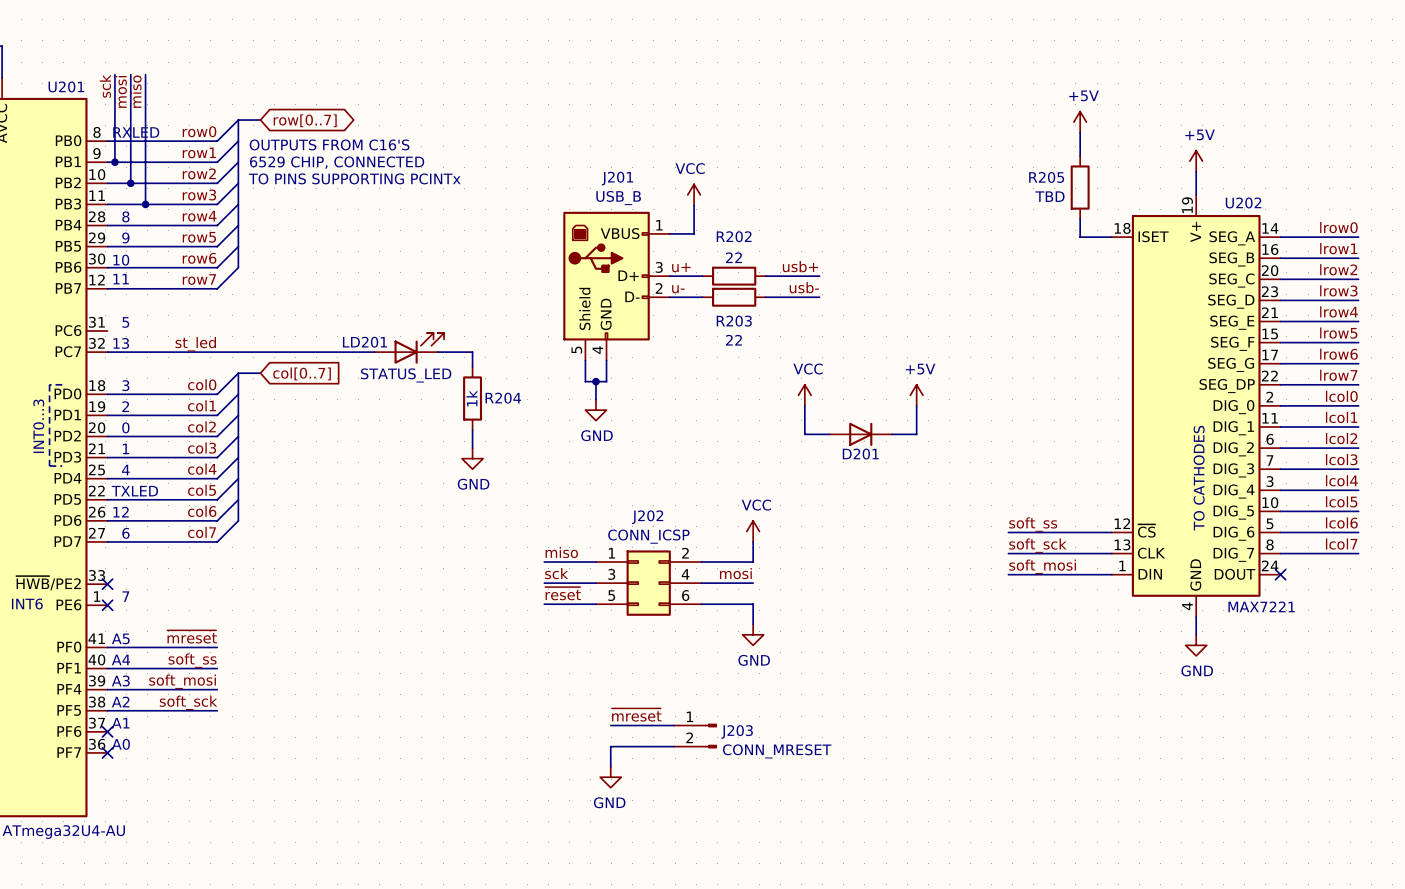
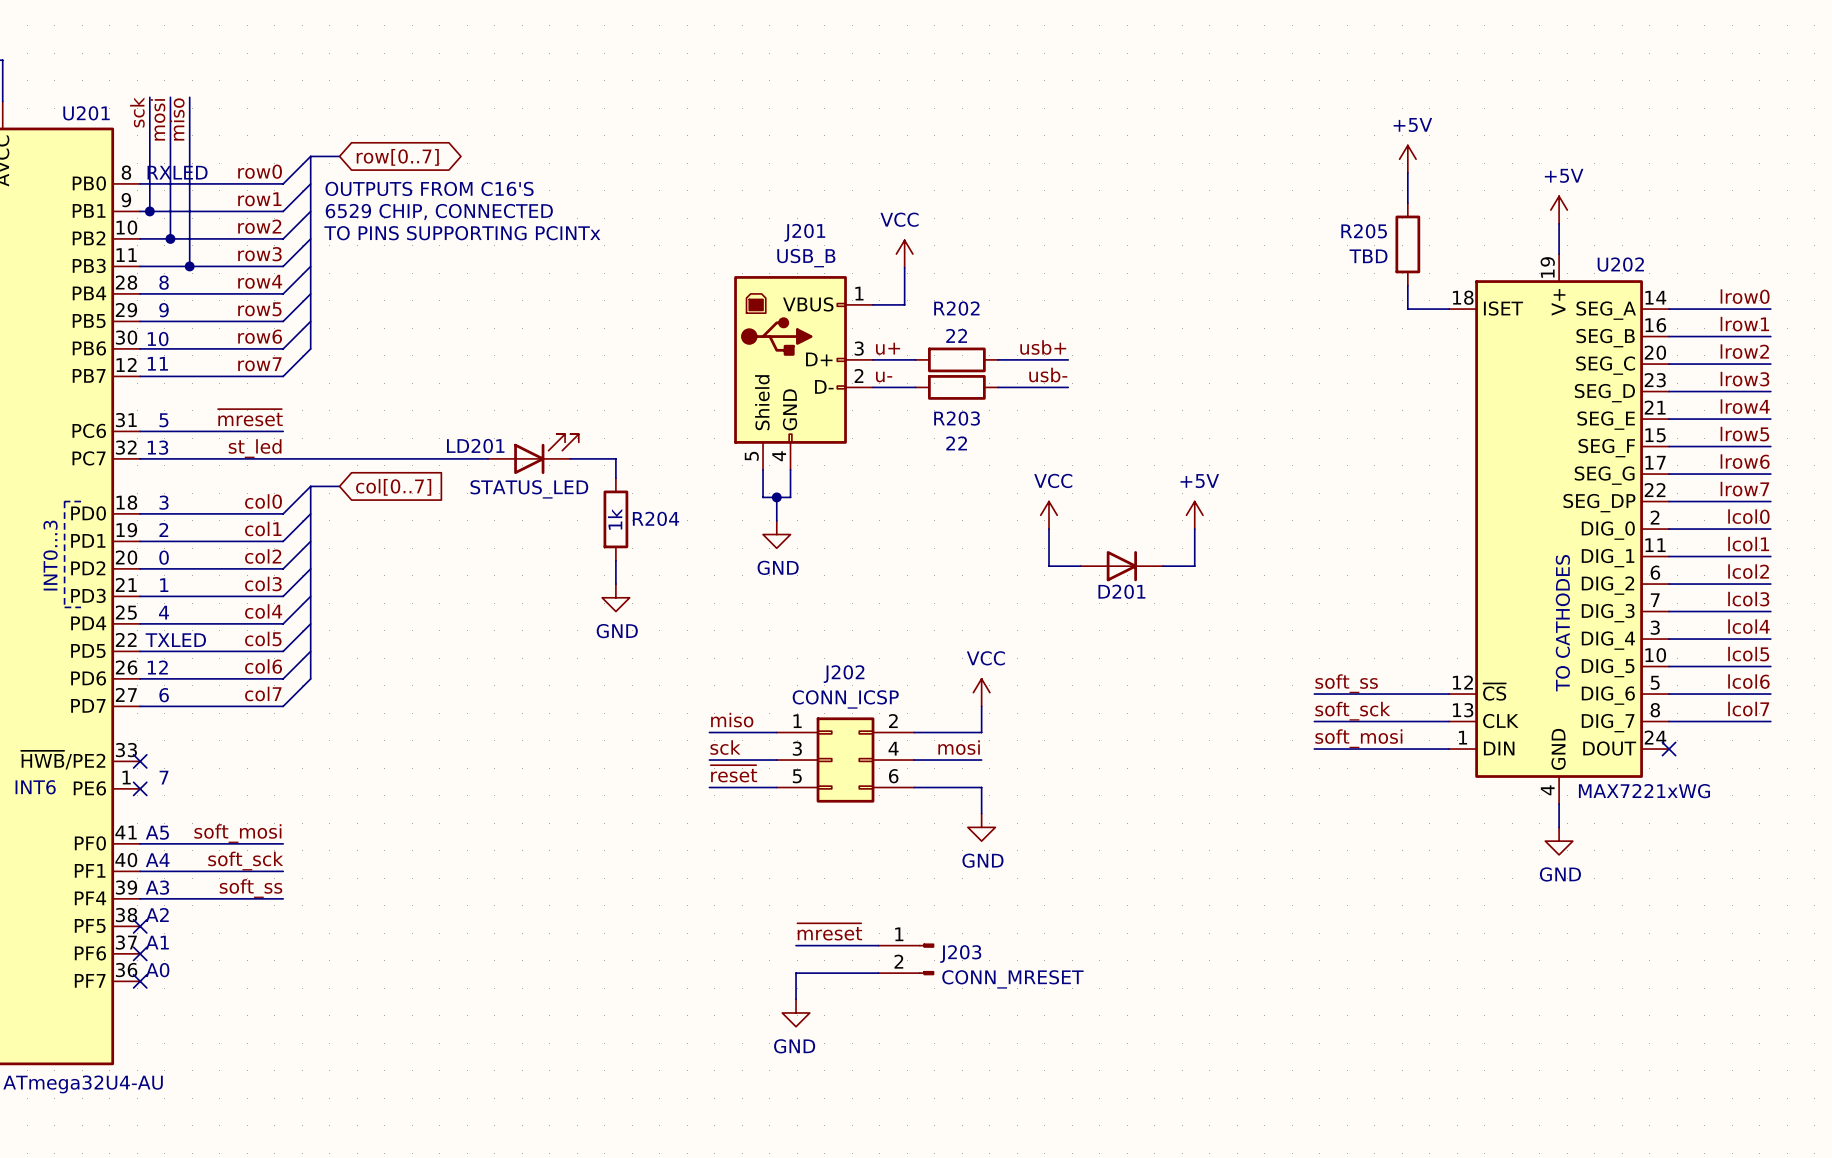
label: none -> ~{mreset} (250, 417)
wire: none -> (140, 431) (283, 431)
U202 value: MAX7221 (1261, 606) -> MAX7221xWG (1644, 791)
label: ~{mreset} (192, 636) -> soft_mosi (237, 833)
label: soft_ss (192, 660) -> soft_sck (245, 861)
label: soft_mosi (182, 681) -> soft_ss (251, 888)
label: soft_sck (188, 702) -> none
wire: (107, 710) (217, 710) -> none
no-connect mark: none -> (140, 926)

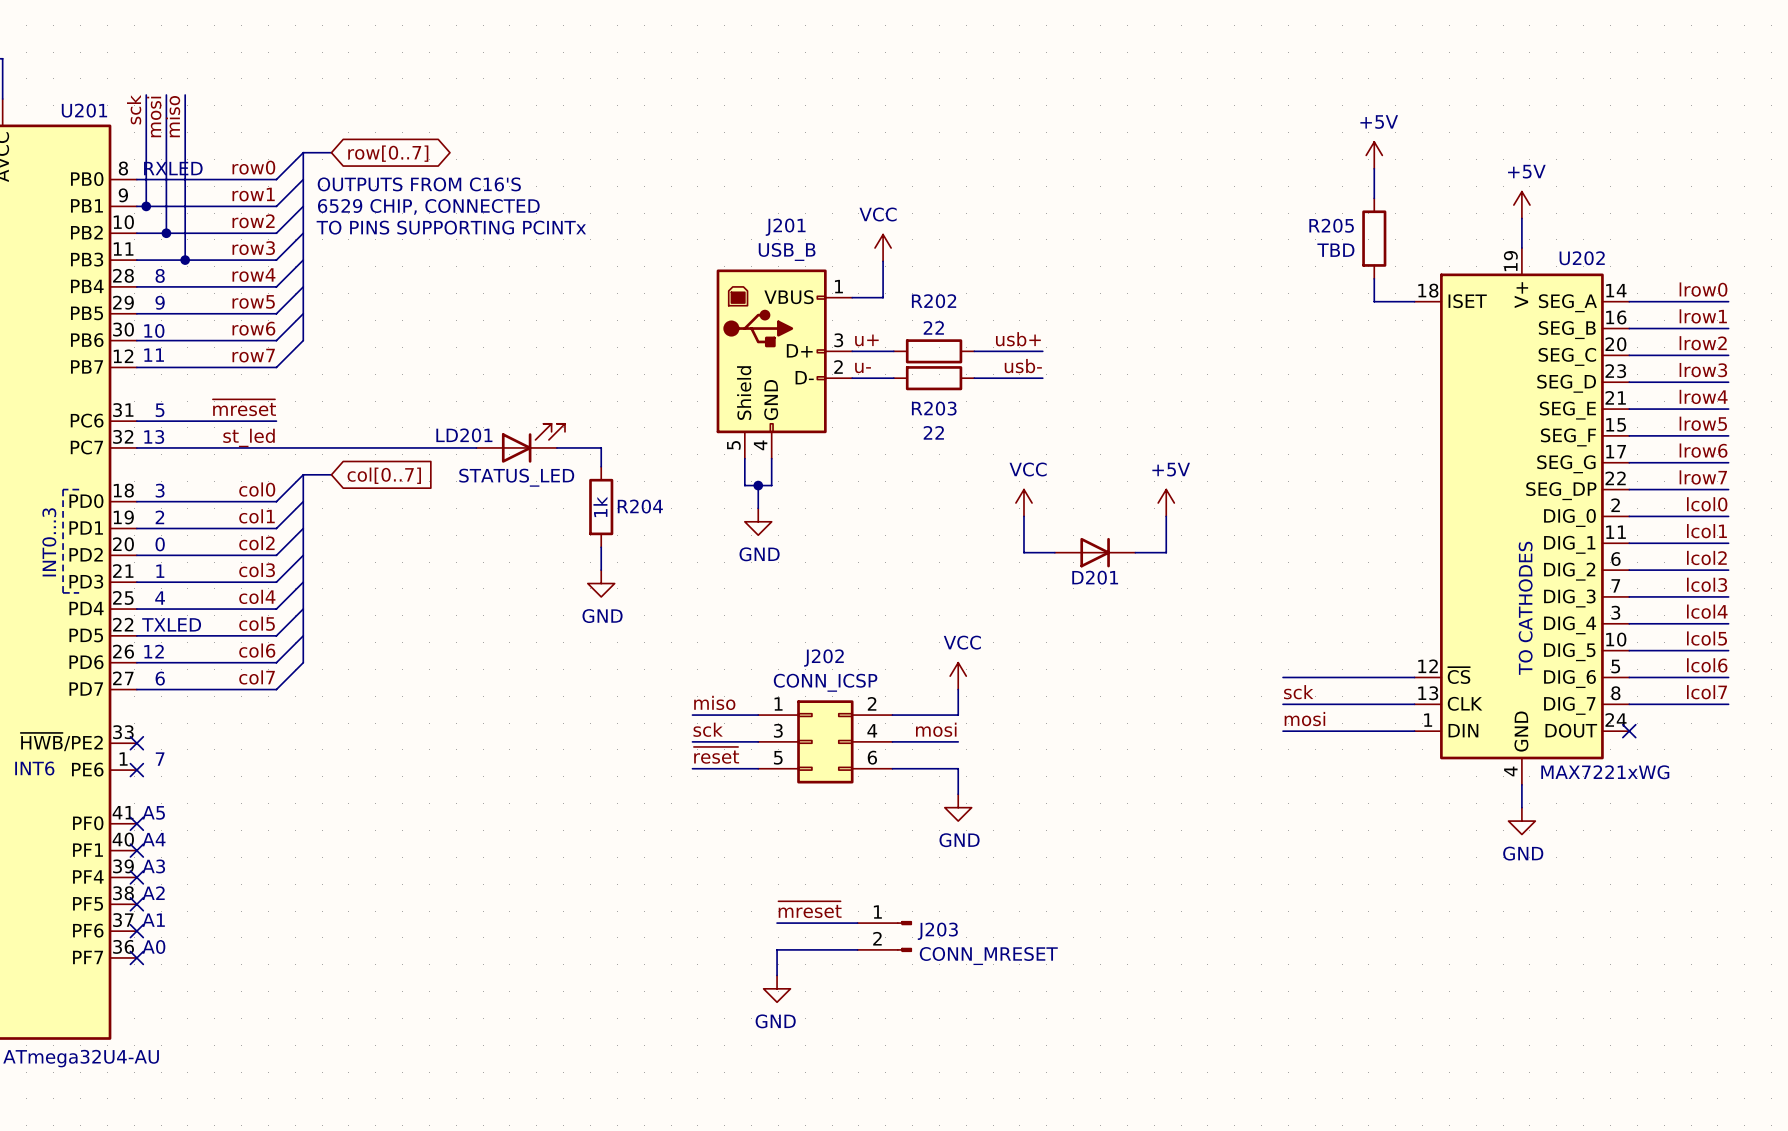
label: soft_ss (1346, 683) -> none
label: soft_sck (1352, 711) -> sck (1298, 692)
label: soft_mosi (1358, 738) -> mosi (1304, 719)
label: soft_mosi (237, 833) -> none
wire: (140, 843) (283, 843) -> none
no-connect mark: none -> (136, 823)
label: soft_sck (245, 861) -> none
wire: (140, 871) (283, 871) -> none
no-connect mark: none -> (136, 850)
label: soft_ss (251, 888) -> none
wire: (140, 898) (283, 898) -> none
no-connect mark: none -> (136, 877)

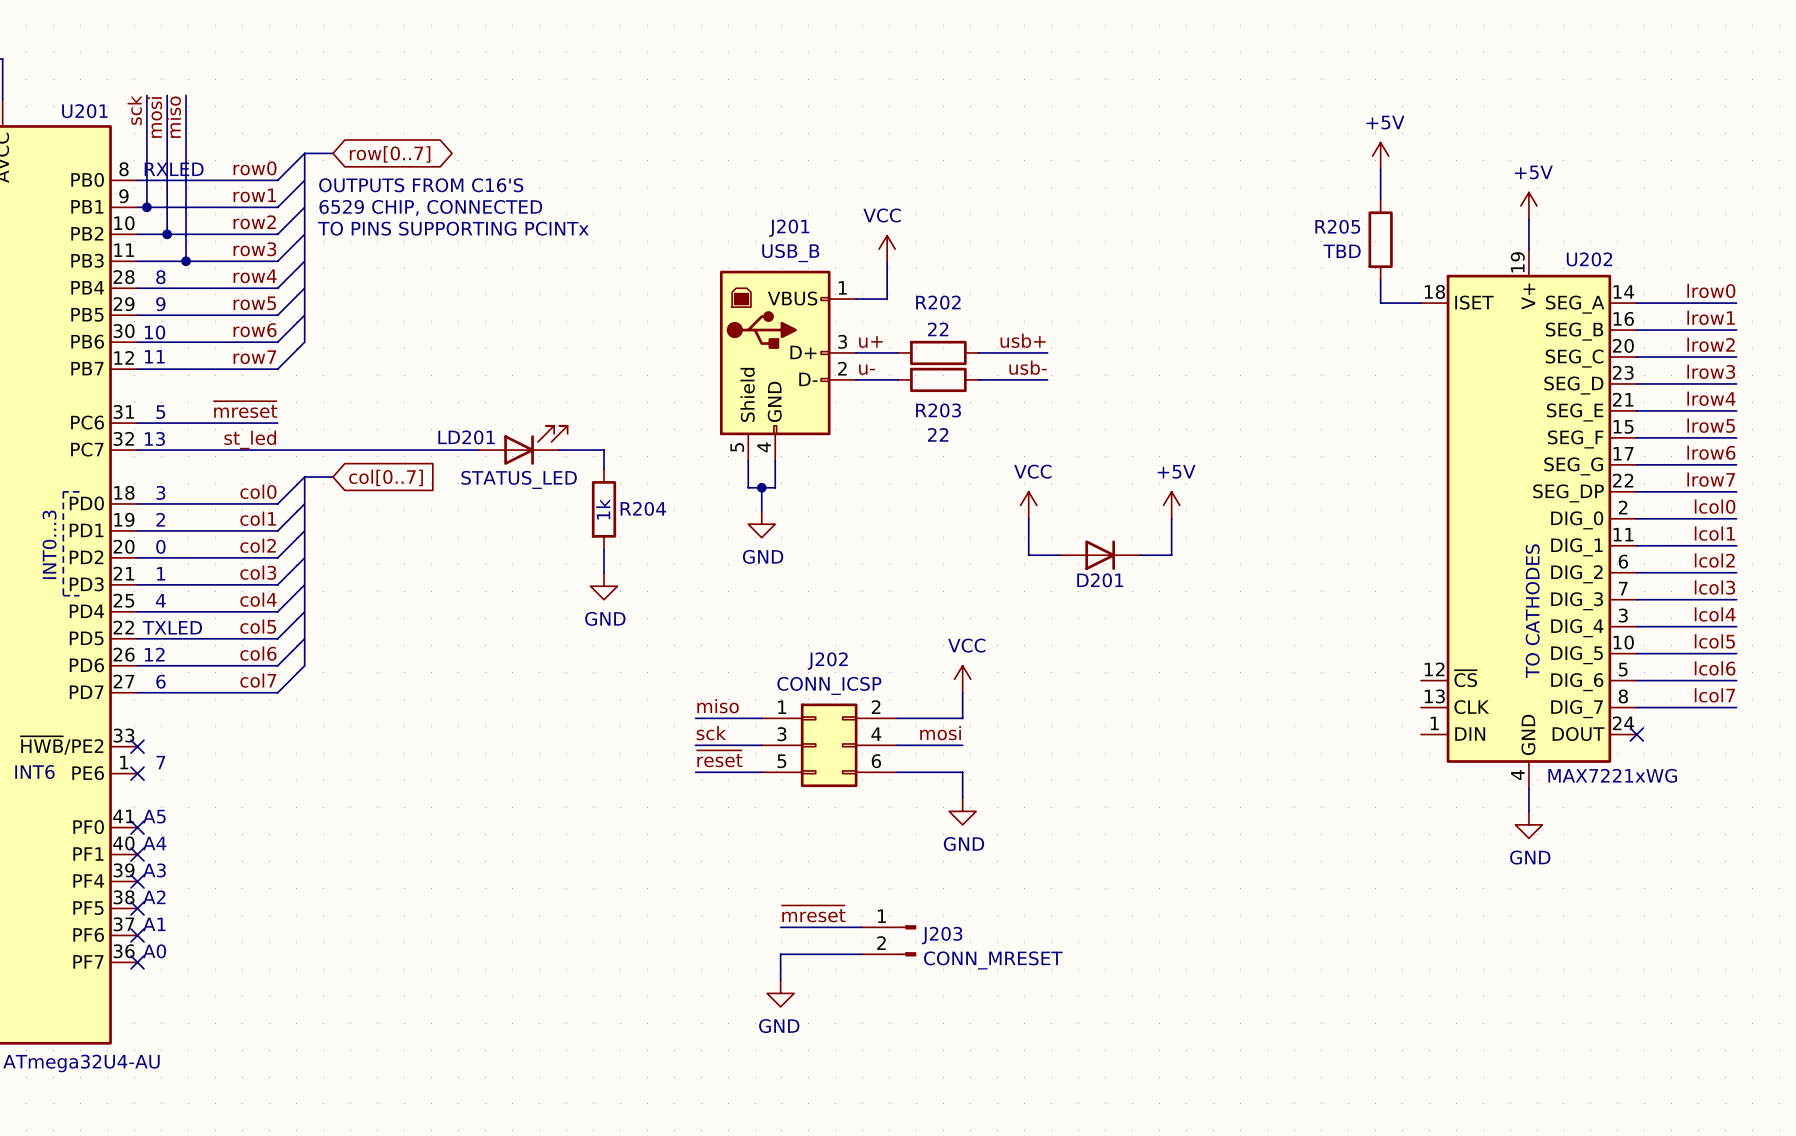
wire: (1283, 677) (1414, 677) -> none
label: sck (1298, 692) -> none
wire: (1283, 704) (1414, 704) -> none
label: mosi (1304, 719) -> none
wire: (1283, 731) (1414, 731) -> none

